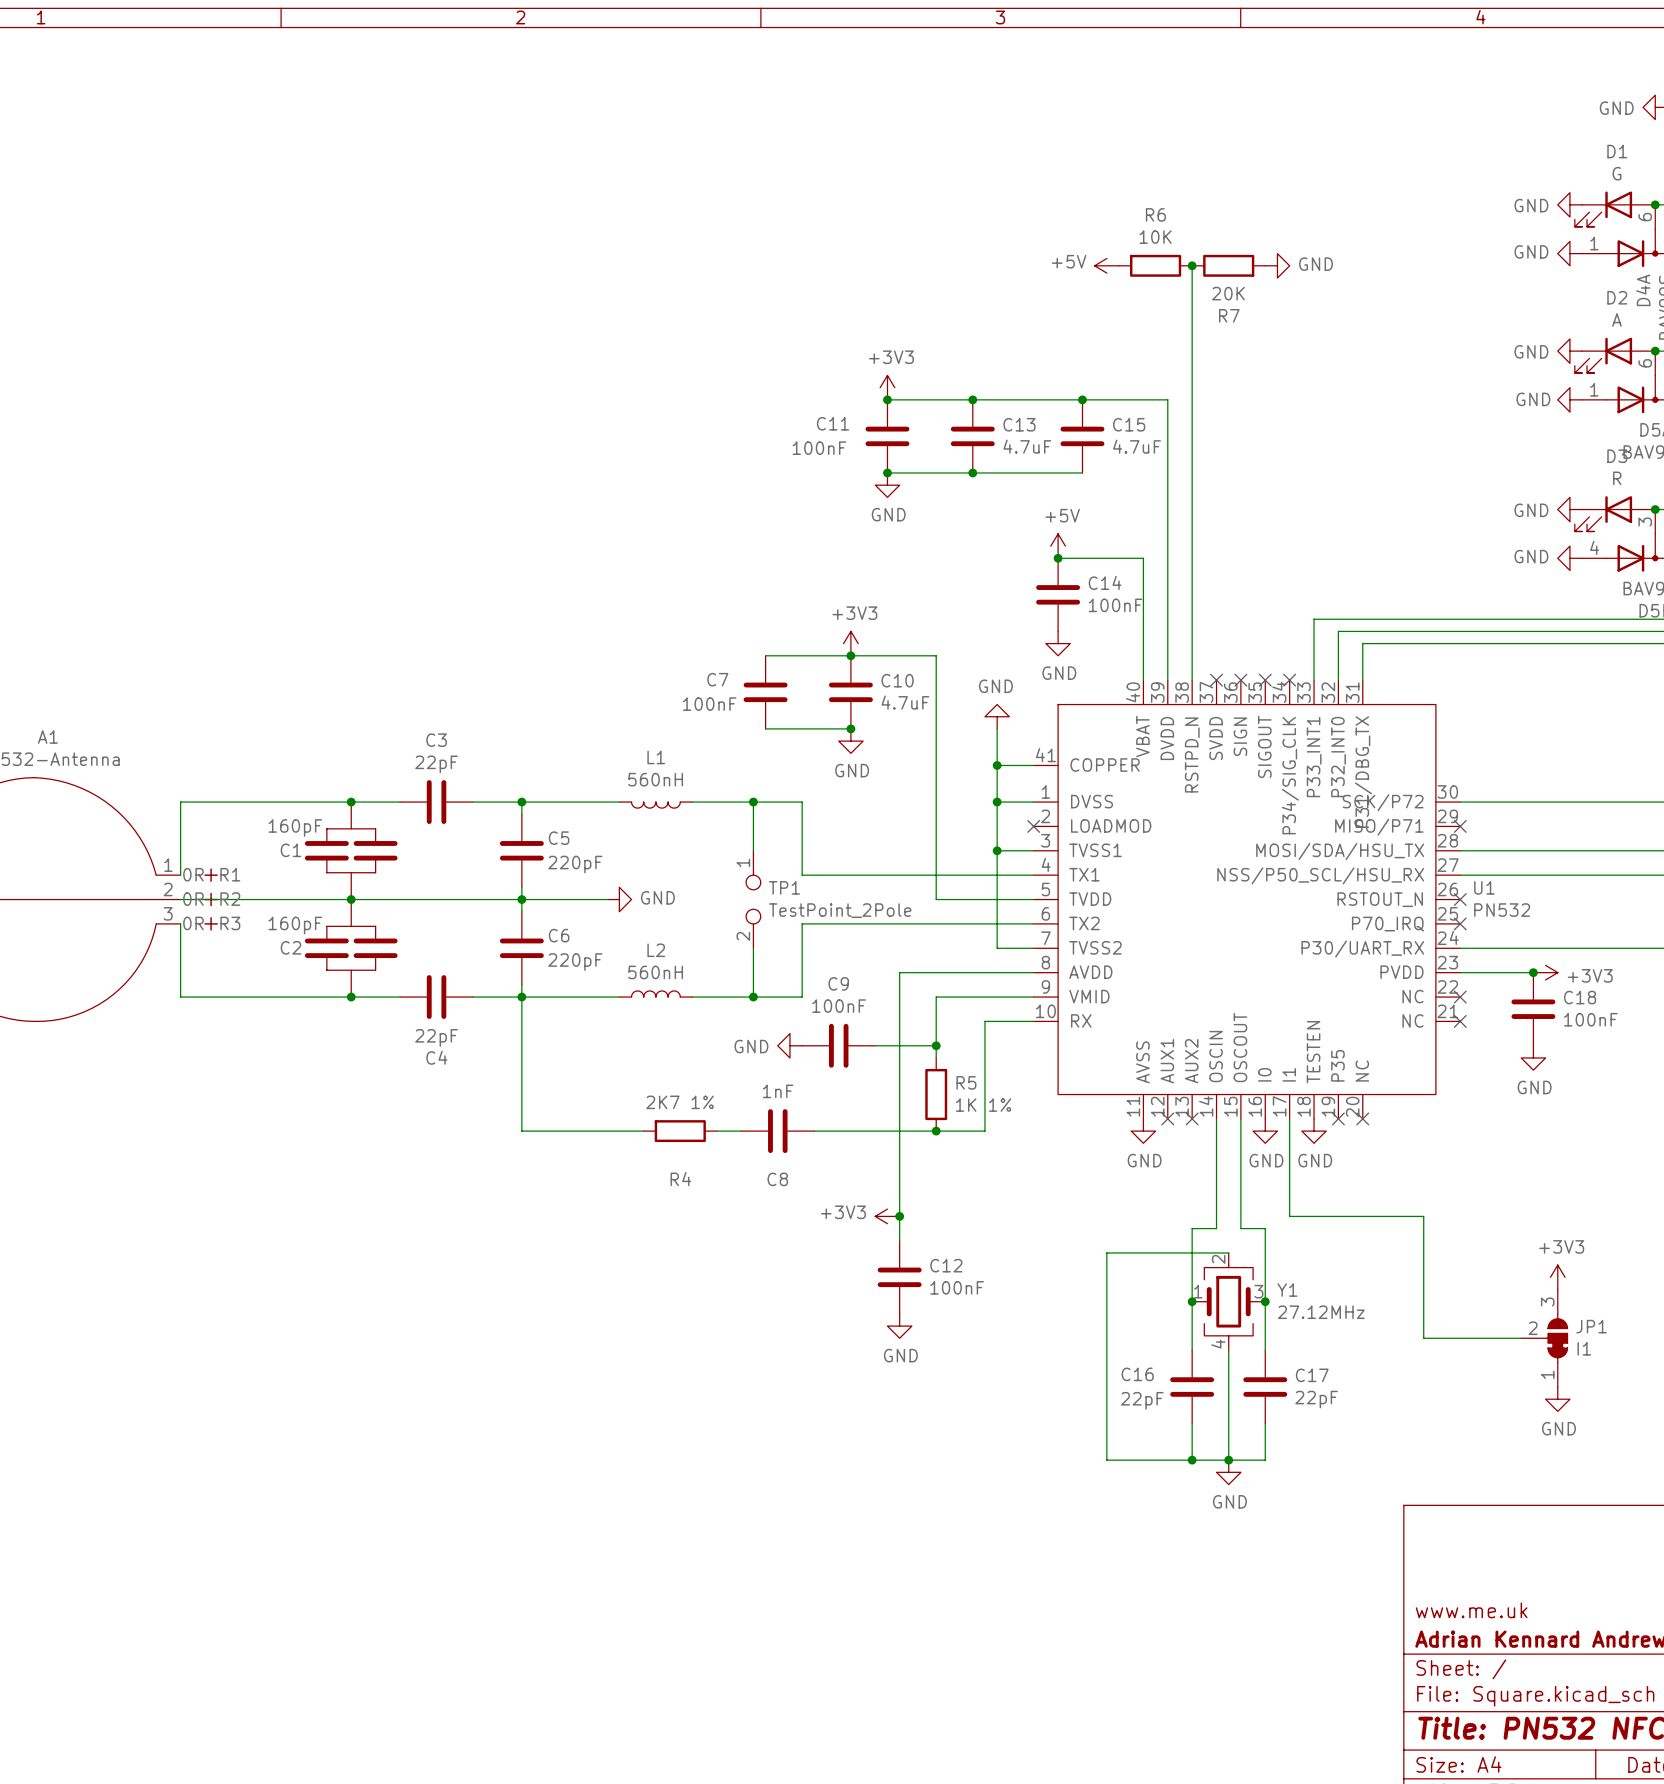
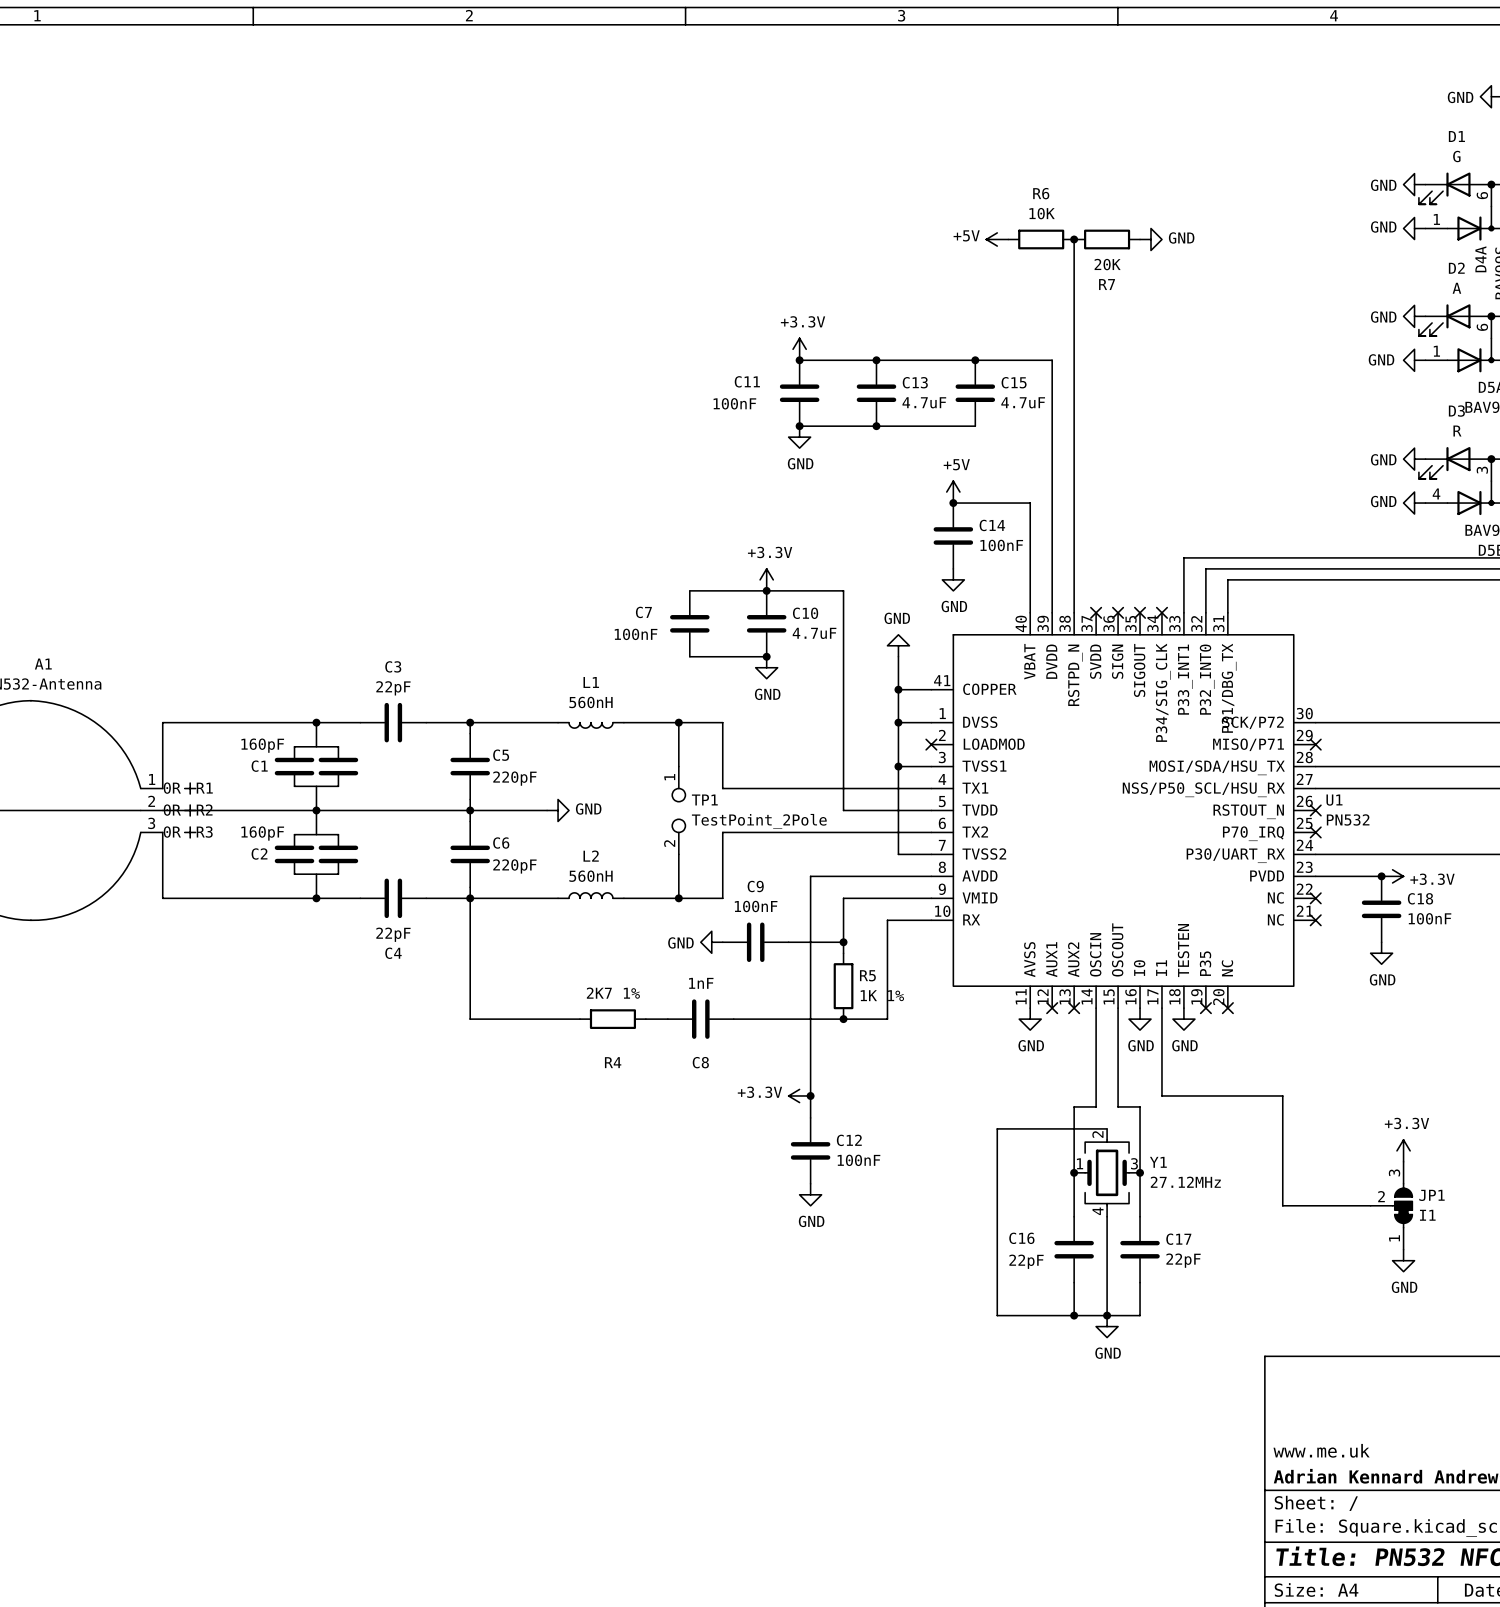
power symbol: +3V3 (887, 387) -> +3.3V (799, 349)
power symbol: +3V3 (850, 643) -> +3.3V (766, 579)
power symbol: +3V3 (1545, 972) -> +3.3V (1392, 876)
power symbol: +3V3 (887, 1216) -> +3.3V (799, 1095)
power symbol: +3V3 (1557, 1277) -> +3.3V (1403, 1150)

